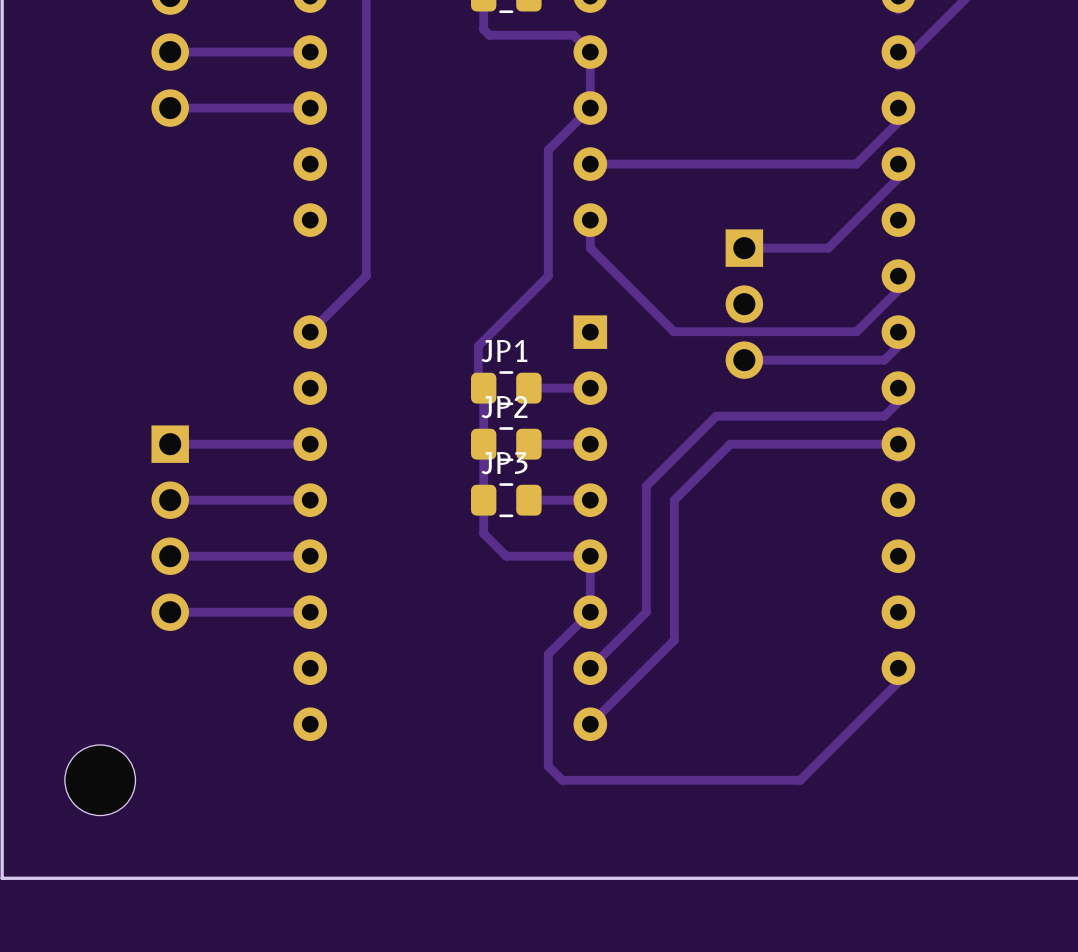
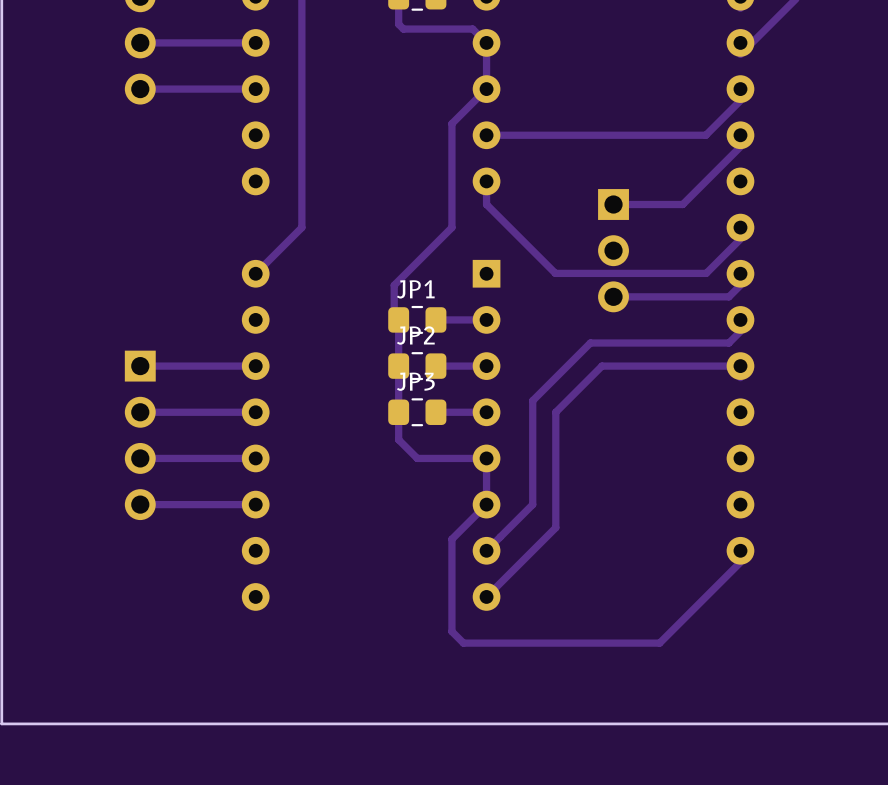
part: (100, 780) -> none

